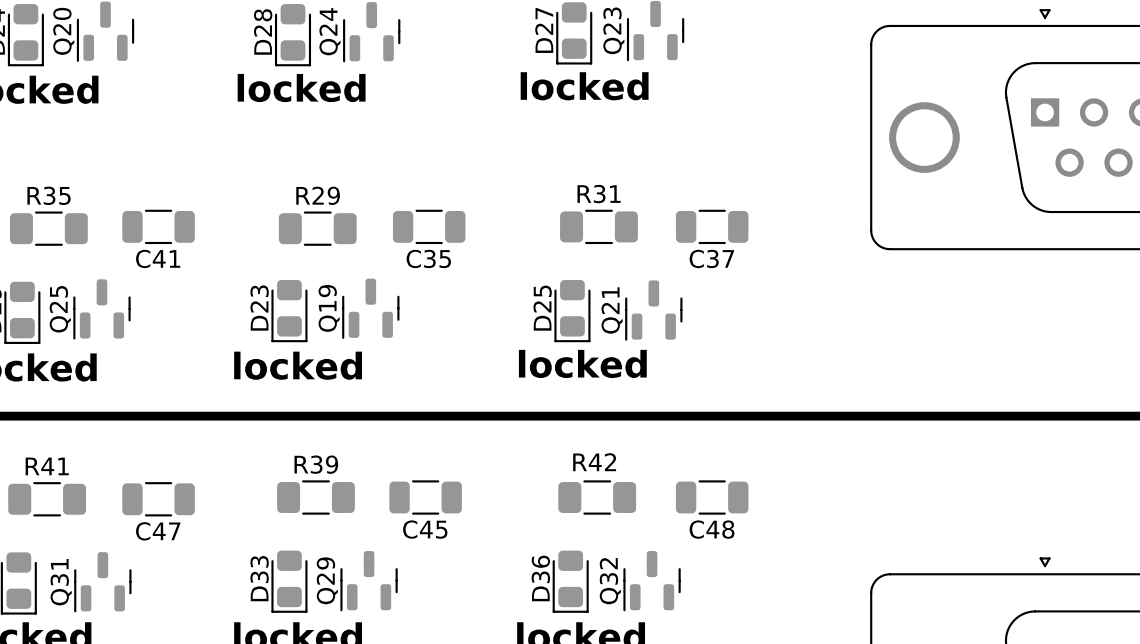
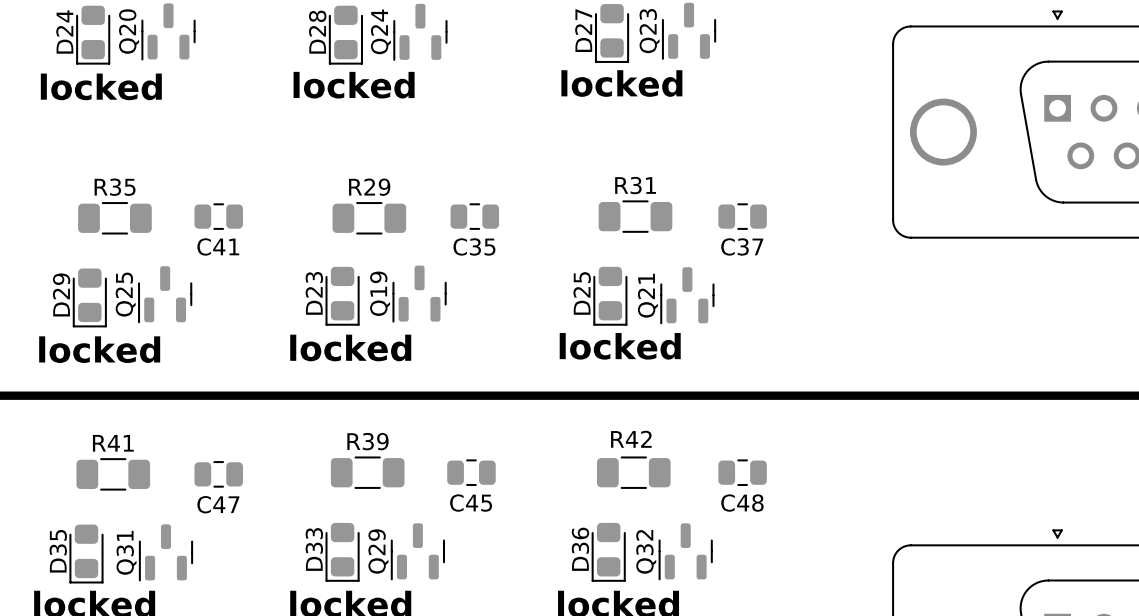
C41 footprint: [122, 209, 195, 245] -> [194, 203, 243, 230]
C35 footprint: [392, 209, 466, 245] -> [450, 203, 500, 230]
C37 footprint: [675, 209, 749, 245] -> [718, 203, 767, 230]
C45 footprint: [389, 480, 462, 515] -> [447, 459, 496, 487]
C48 footprint: [675, 480, 749, 515] -> [718, 459, 767, 487]
C47 footprint: [122, 482, 195, 517] -> [194, 461, 243, 488]

